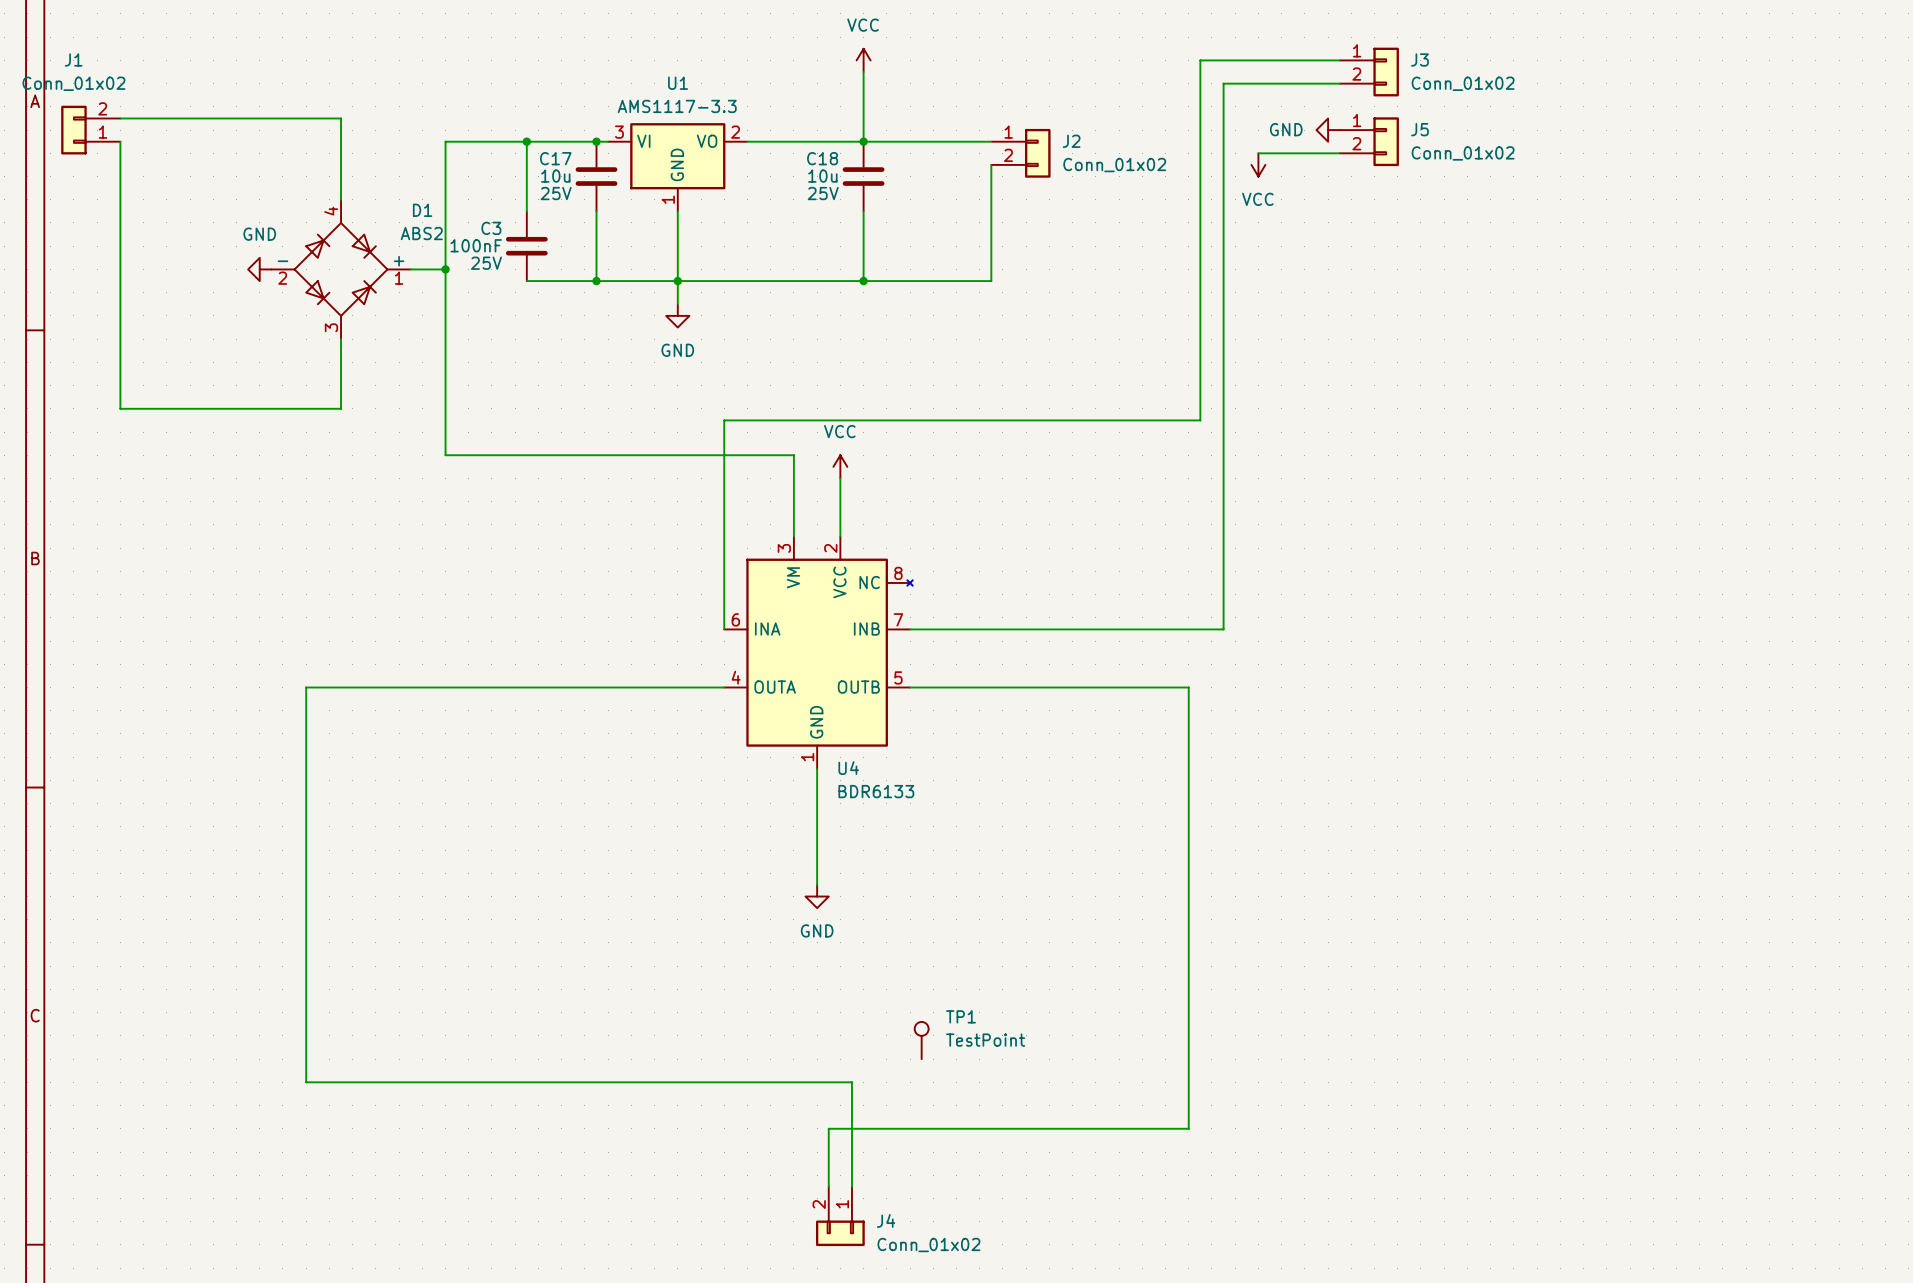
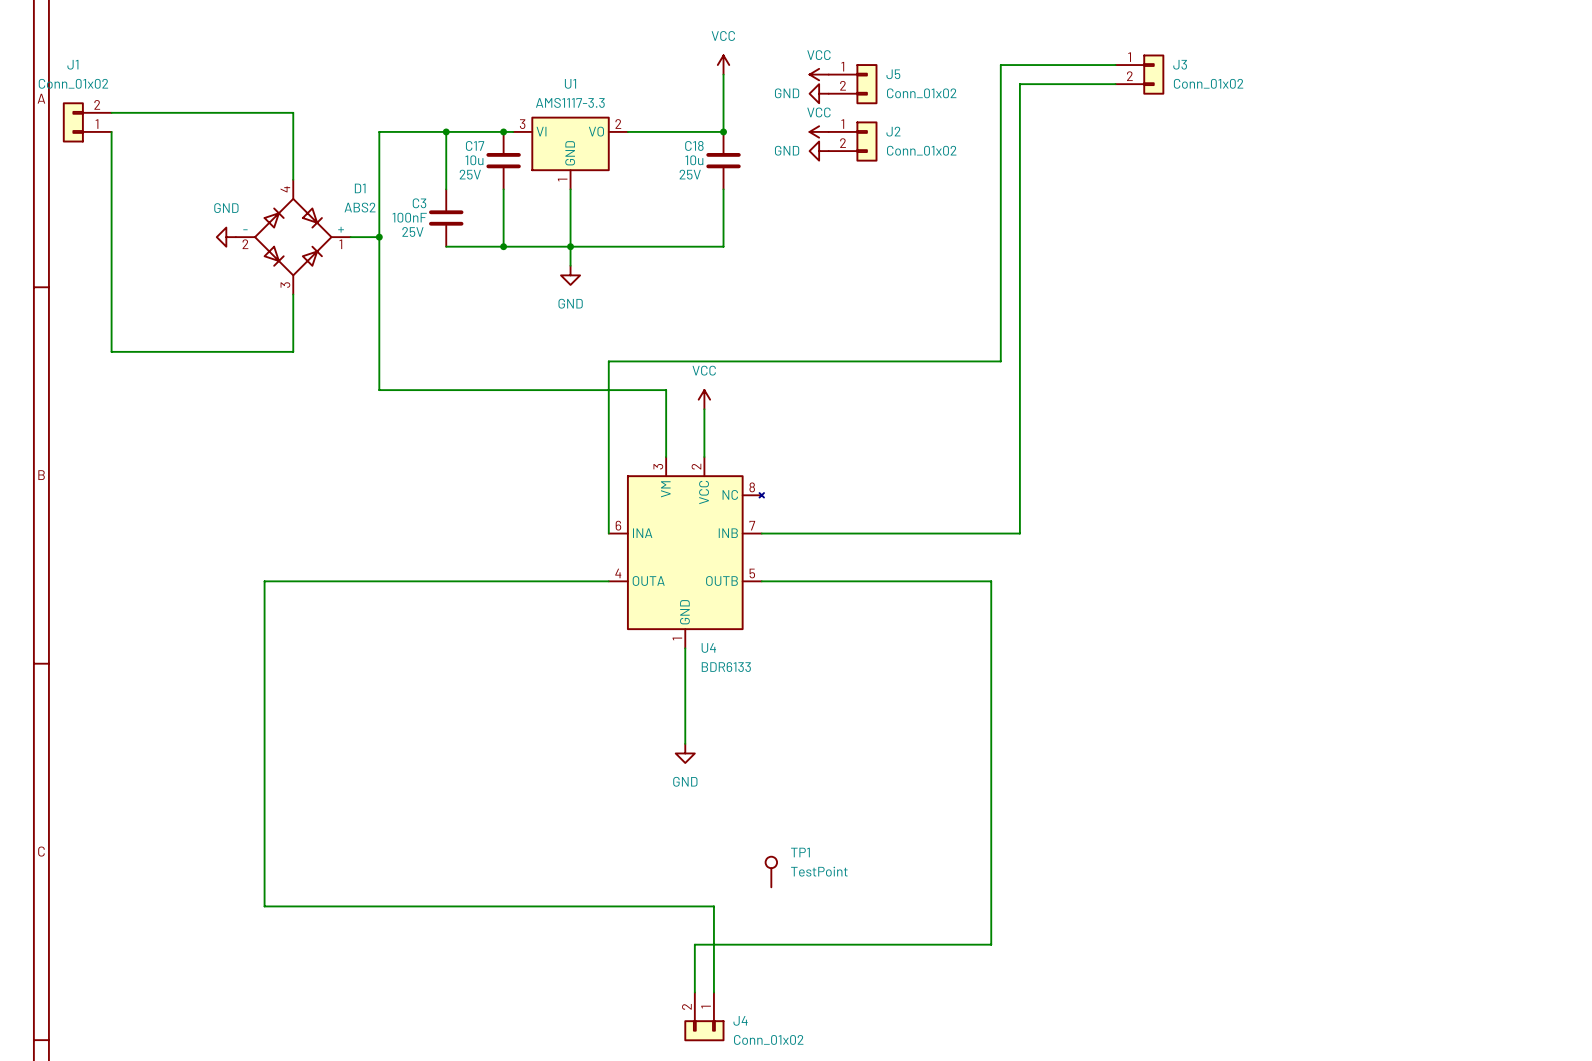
power symbol: none -> VCC (819, 74)
power symbol: none -> GND (819, 93)
power symbol: GND (1328, 130) -> none
wire: (863, 141) (991, 141) -> none
power symbol: none -> VCC (819, 131)
J5 position: (1369, 141) -> (853, 84)
wire: (1258, 153) (1339, 153) -> none
power symbol: none -> GND (819, 151)
wire: (991, 164) (991, 281) (863, 281) -> none
power symbol: VCC (1258, 164) -> none
junction: (863, 281) -> none

